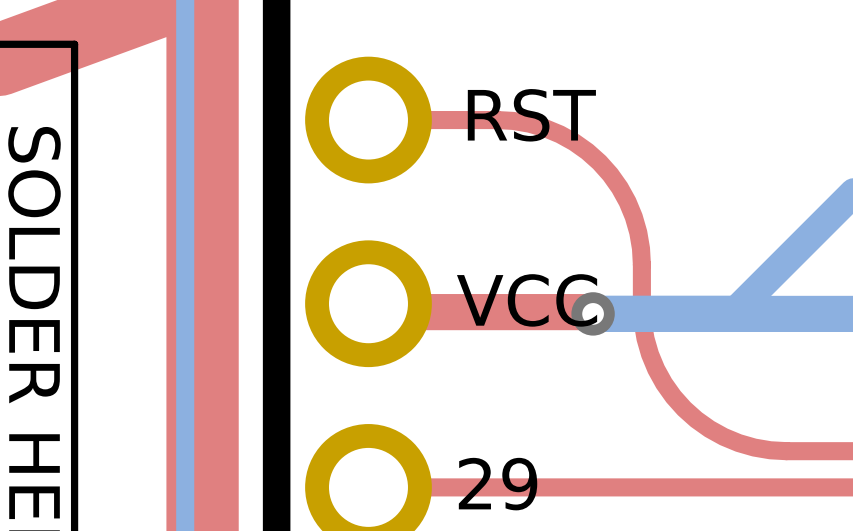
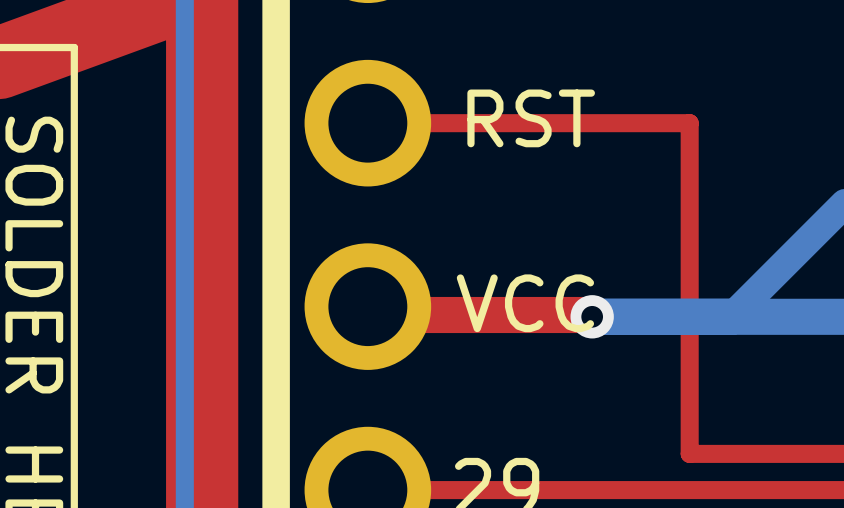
top track: (497, 120) (529, 123) (545, 128) (574, 142) (599, 162) (619, 187) (627, 201) (638, 232) (640, 248) (641, 306) (645, 338) (656, 369) (673, 396) (696, 419) (723, 436) (754, 447) (786, 451) -> (496, 123) (689, 123) (689, 453) (785, 453)

